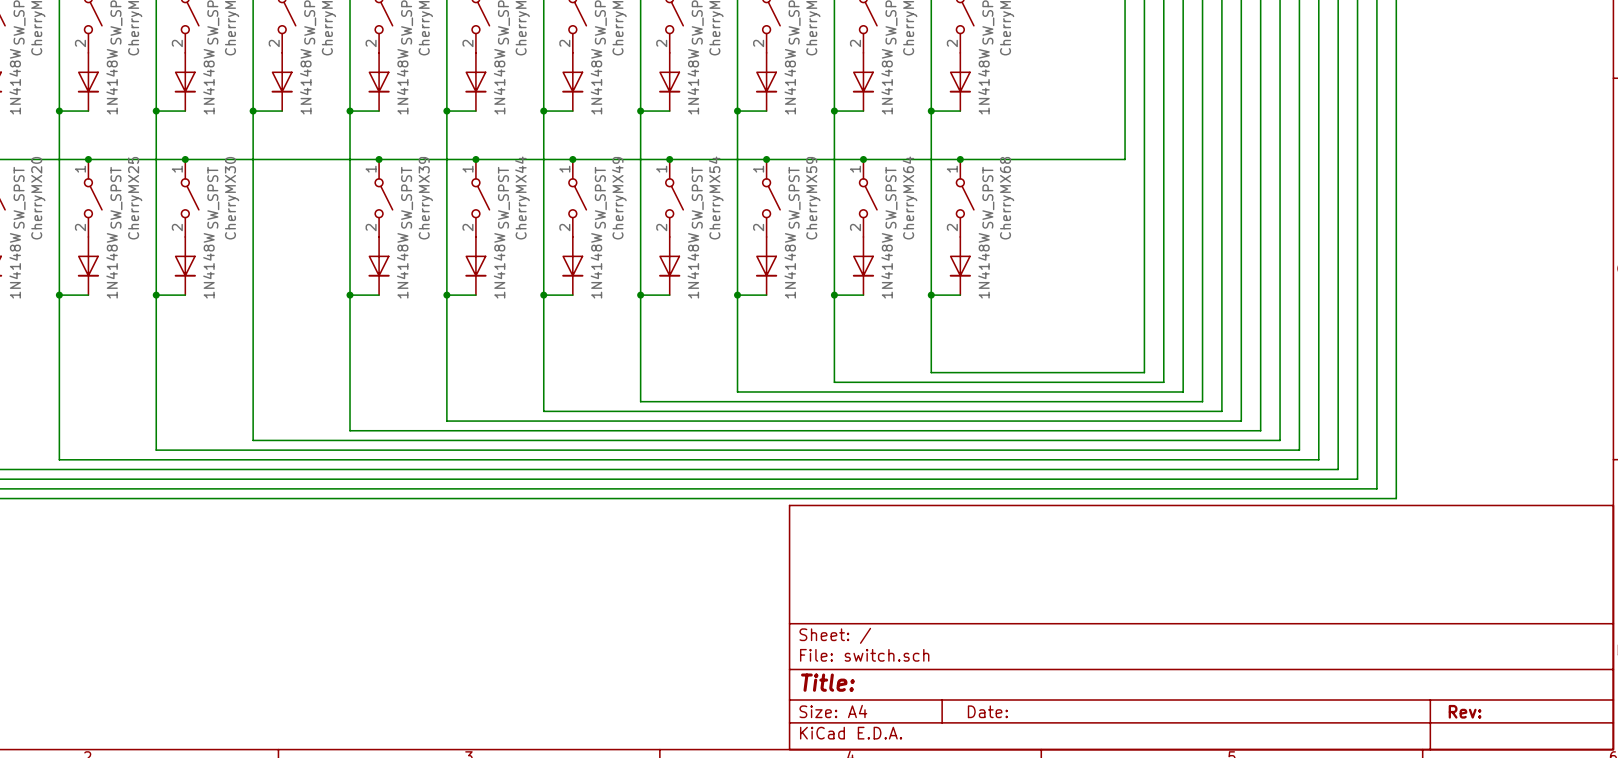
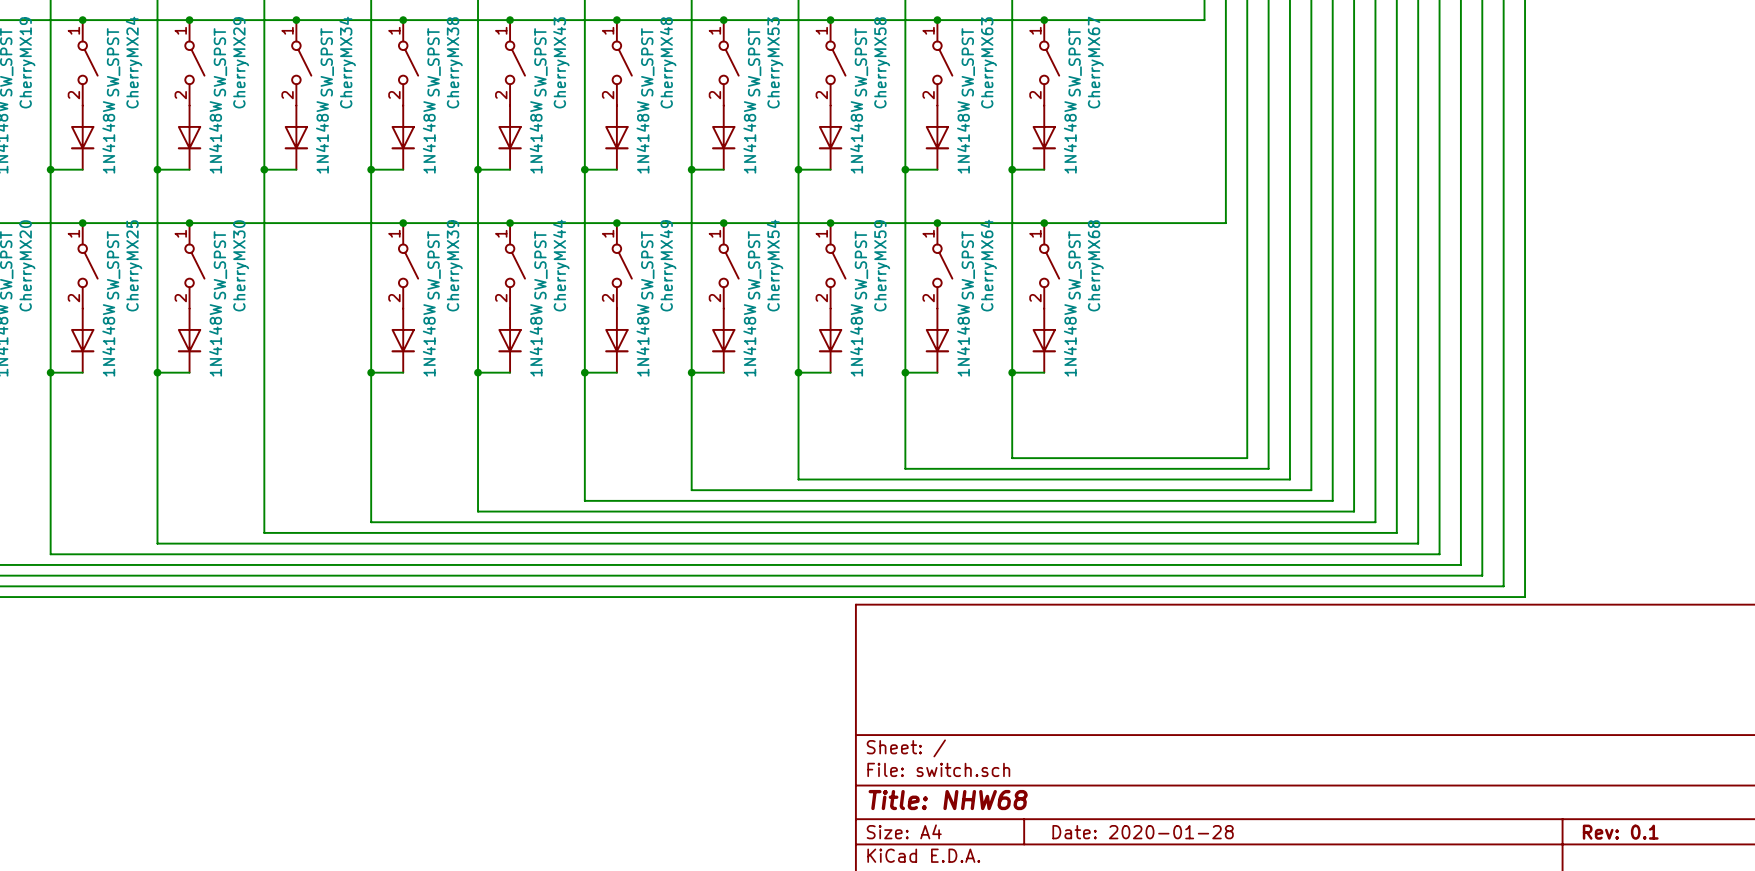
title block: Title: (827, 682) -> Title: NHW68 (948, 800)
title block: Date: (987, 711) -> Date: 2020-01-28 (1143, 832)
title block: Rev: (1465, 711) -> Rev: 0.1 (1620, 832)

